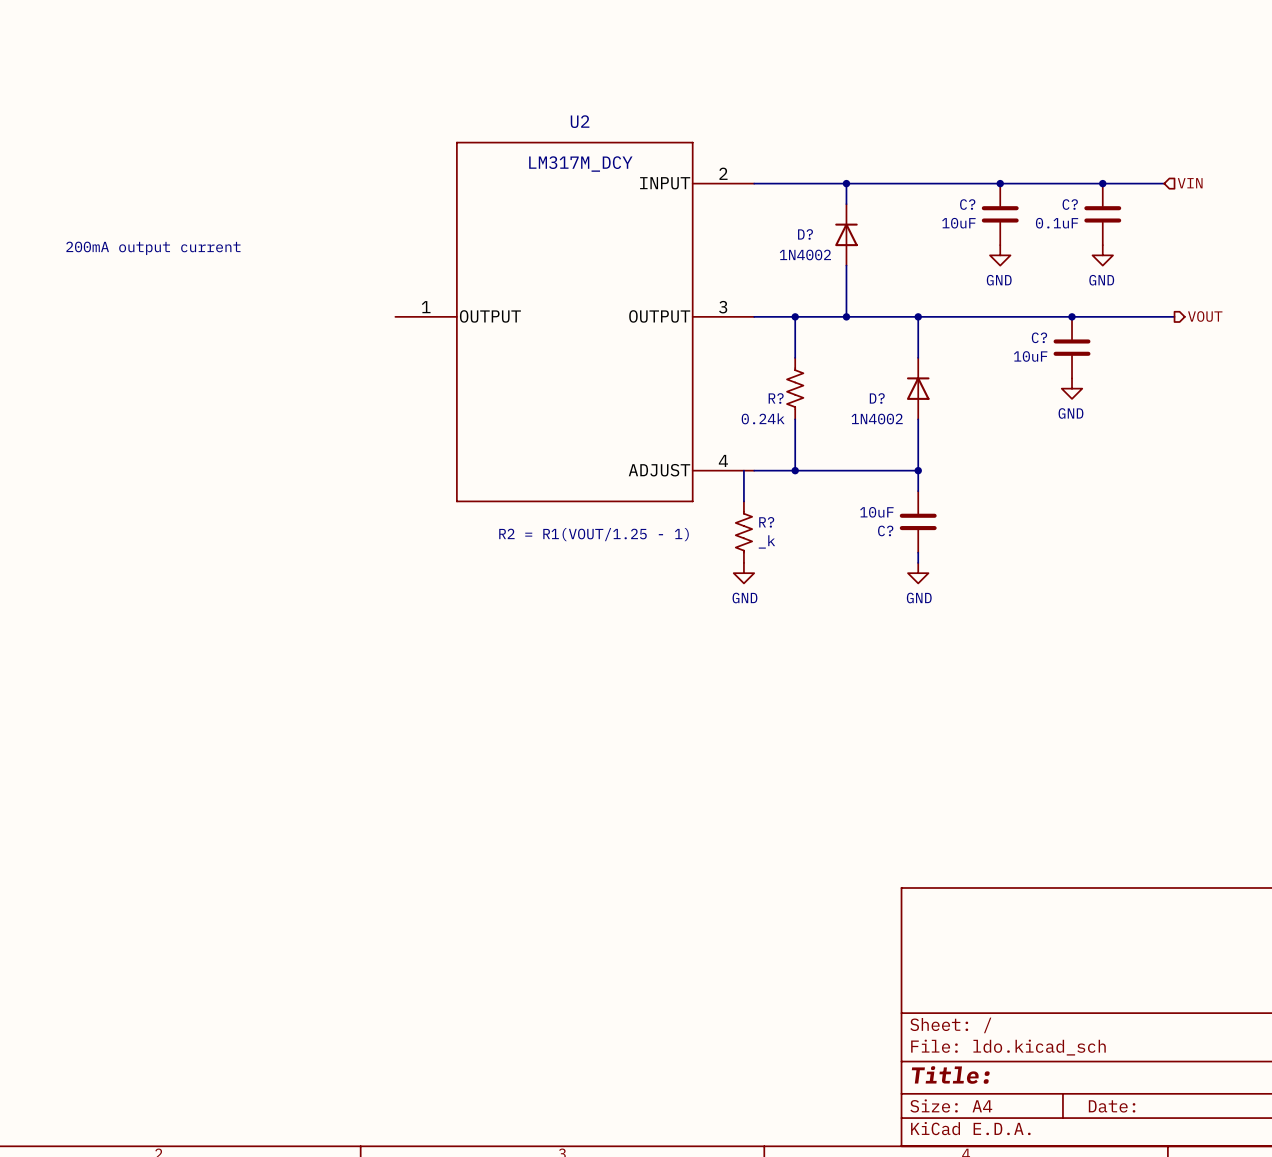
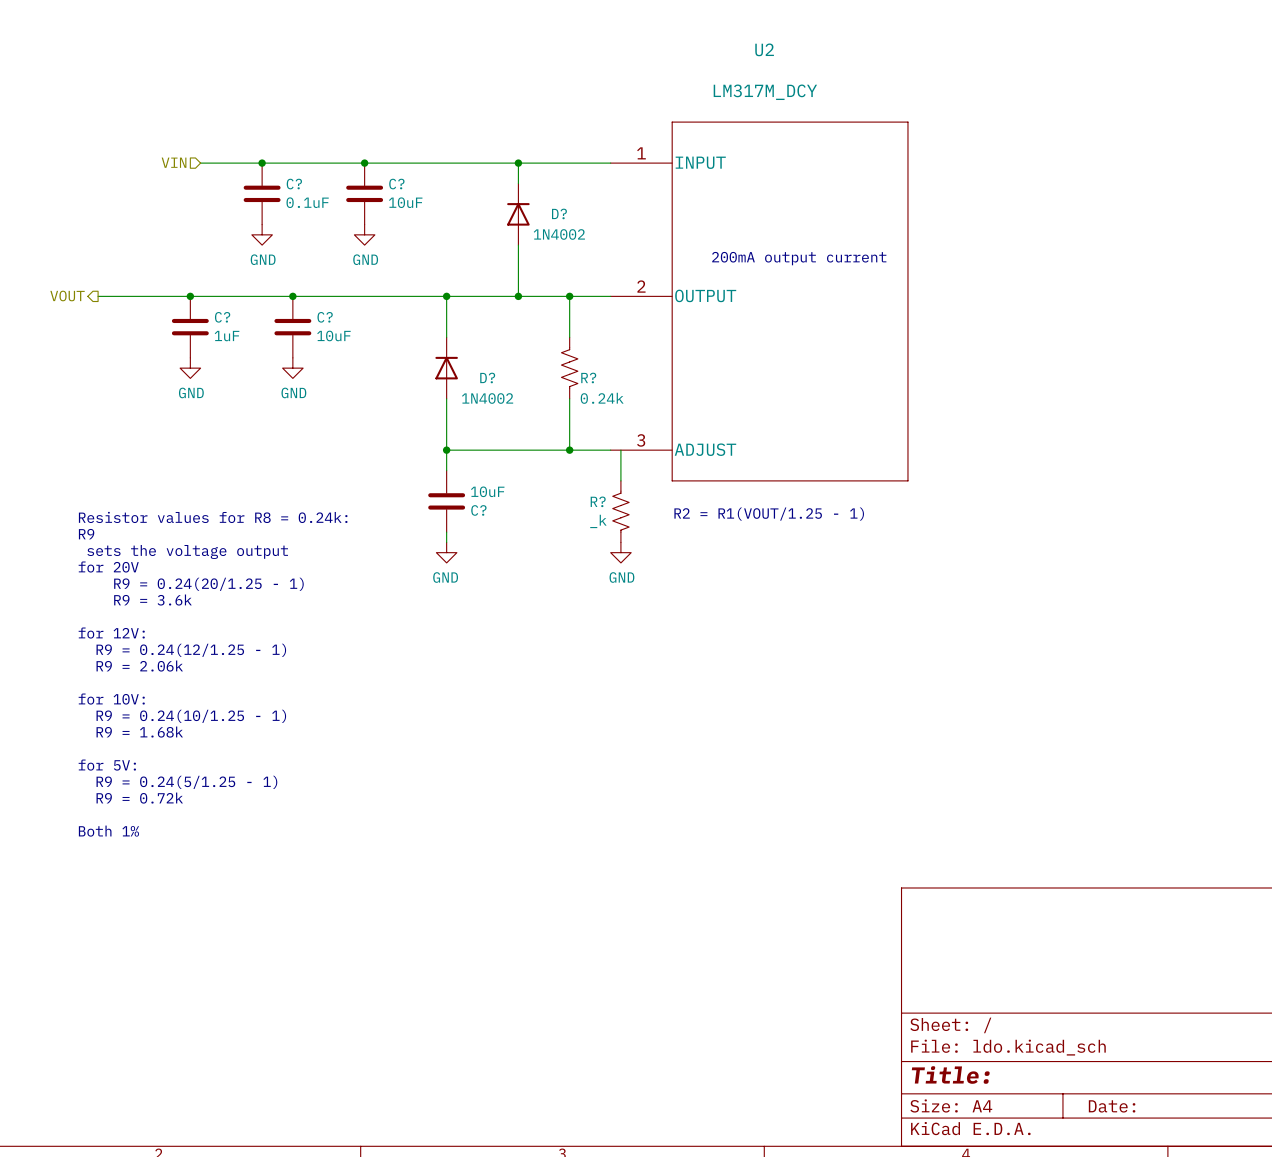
U2 name position: U2 (580, 121) -> U2 (764, 49)
U2 symbol: [395, 142, 755, 502] -> [610, 121, 909, 482]
hierarchical label: none -> VIN (174, 162)
wire: none -> (200, 163) (610, 163)
junction: none -> (262, 163)
junction: none -> (364, 163)
wire: none -> (518, 163) (518, 183)
junction: none -> (518, 163)
U2 value position: LM317M_DCY (580, 164) -> LM317M_DCY (765, 92)
wire: (754, 183) (1164, 183) -> none
wire: (846, 183) (846, 204) -> none
junction: (846, 183) -> none
junction: (1000, 183) -> none
junction: (1102, 183) -> none
hierarchical label: VIN (1190, 183) -> none
C?: none -> 0.1uF (262, 193)
C?: none -> 10uF (364, 193)
D?: none -> 1N4002 (518, 214)
C?: 10uF (1000, 214) -> none
C?: 0.1uF (1102, 214) -> none
power symbol: none -> GND (262, 234)
power symbol: none -> GND (364, 234)
D?: 1N4002 (846, 234) -> none
wire: none -> (518, 245) (518, 296)
text: 200mA output current (153, 248) -> none
power symbol: GND (1000, 255) -> none
power symbol: GND (1102, 255) -> none
text: none -> 200mA output current (799, 258)
wire: (846, 265) (846, 316) -> none
hierarchical label: none -> VOUT (67, 295)
wire: none -> (98, 296) (610, 296)
junction: none -> (190, 296)
junction: none -> (292, 296)
wire: none -> (446, 296) (446, 337)
junction: none -> (446, 296)
junction: none -> (518, 296)
wire: none -> (569, 296) (569, 337)
junction: none -> (569, 296)
wire: (754, 316) (1174, 316) -> none
wire: (795, 316) (795, 357) -> none
junction: (795, 316) -> none
junction: (846, 316) -> none
wire: (918, 316) (918, 357) -> none
junction: (918, 316) -> none
junction: (1072, 316) -> none
hierarchical label: VOUT (1205, 316) -> none
C?: none -> 1uF (190, 327)
C?: none -> 10uF (292, 327)
C?: 10uF (1072, 347) -> none
power symbol: none -> GND (190, 368)
power symbol: none -> GND (292, 368)
D?: none -> 1N4002 (446, 368)
R?: none -> 0.24k (569, 368)
R?: 0.24k (795, 388) -> none
D?: 1N4002 (918, 388) -> none
power symbol: GND (1072, 388) -> none
wire: none -> (446, 398) (446, 470)
wire: none -> (569, 398) (569, 450)
wire: (795, 419) (795, 470) -> none
wire: (918, 419) (918, 491) -> none
wire: none -> (446, 450) (610, 450)
junction: none -> (446, 450)
junction: none -> (569, 450)
wire: (743, 470) (743, 501) -> (620, 450) (620, 480)
wire: (754, 470) (918, 470) -> none
junction: (795, 470) -> none
junction: (918, 470) -> none
C?: none -> 10uF (446, 501)
R?: none -> _k (620, 511)
text: none -> R2 = R1(VOUT/1.25 - 1) (769, 514)
text: none -> Resistor values for R8 = 0.24k: (213, 517)
C?: 10uF (918, 521) -> none
wire: none -> (446, 532) (446, 542)
R?: _k (743, 532) -> none
text: none -> R9 (86, 534)
text: R2 = R1(VOUT/1.25 - 1) (594, 534) -> none
text: none -> sets the voltage output (187, 551)
power symbol: none -> GND (446, 552)
wire: (918, 552) (918, 562) -> none
text: none -> for 20V (108, 567)
power symbol position: GND (743, 573) -> GND (620, 552)
power symbol: GND (918, 573) -> none
text: none -> R9 = 0.24(20/1.25 - 1) (208, 584)
text: none -> R9 = 3.6k (152, 600)
text: none -> for 12V: (111, 633)
text: none -> R9 = 0.24(12/1.25 - 1) (191, 650)
text: none -> R9 = 2.06k (139, 666)
text: none -> for 10V: (111, 699)
text: none -> R9 = 0.24(10/1.25 - 1) (191, 716)
text: none -> R9 = 1.68k (139, 732)
text: none -> for 5V: (107, 765)
text: none -> R9 = 0.24(5/1.25 - 1) (186, 782)
text: none -> R9 = 0.72k (139, 798)
text: none -> Both 1% (108, 831)

